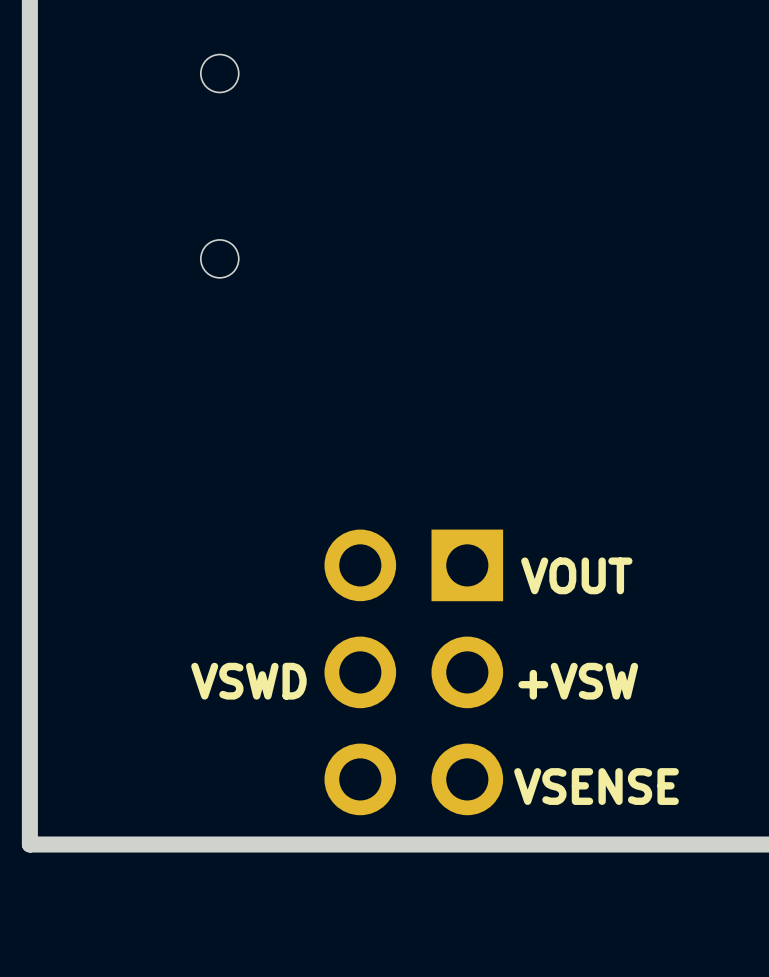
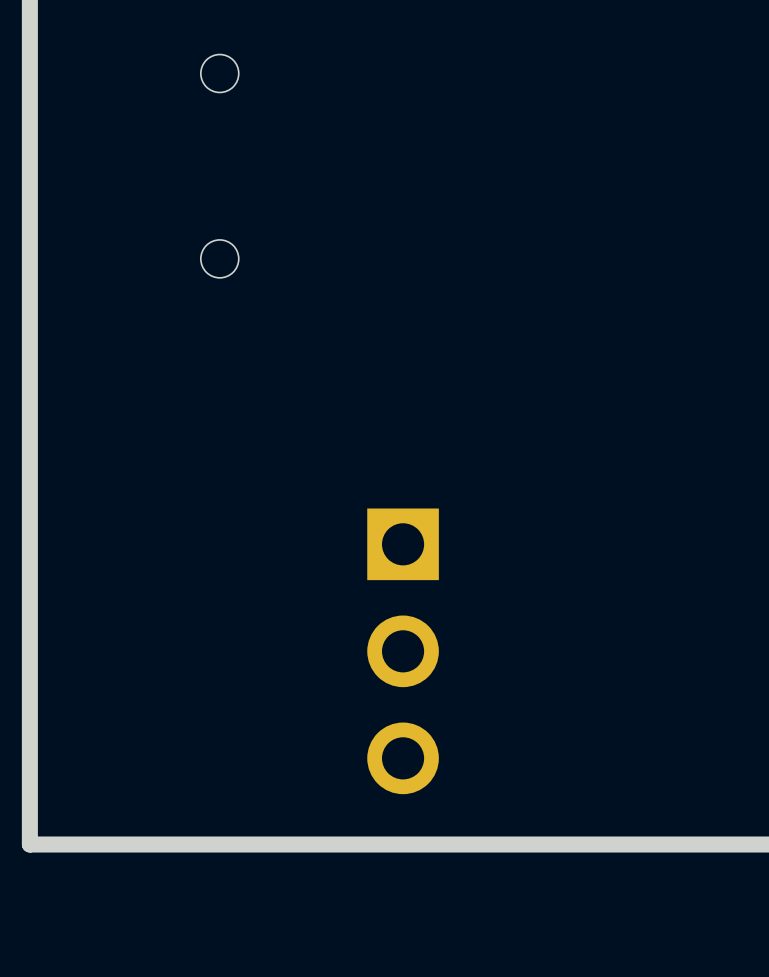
part footprint: [324, 529, 504, 816] -> [367, 508, 439, 795]
text: VOUT (576, 575) -> none
text: VSWD (248, 681) -> none
text: +VSW (578, 681) -> none
text: VSENSE (596, 786) -> none

